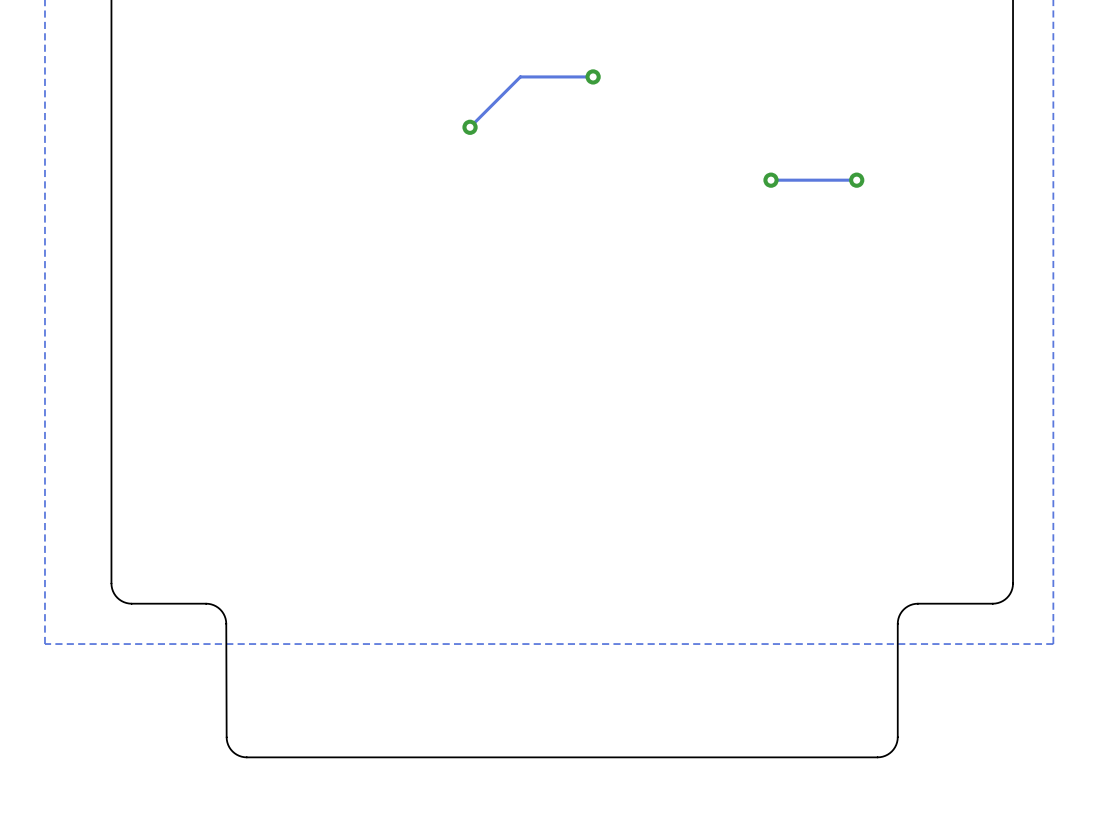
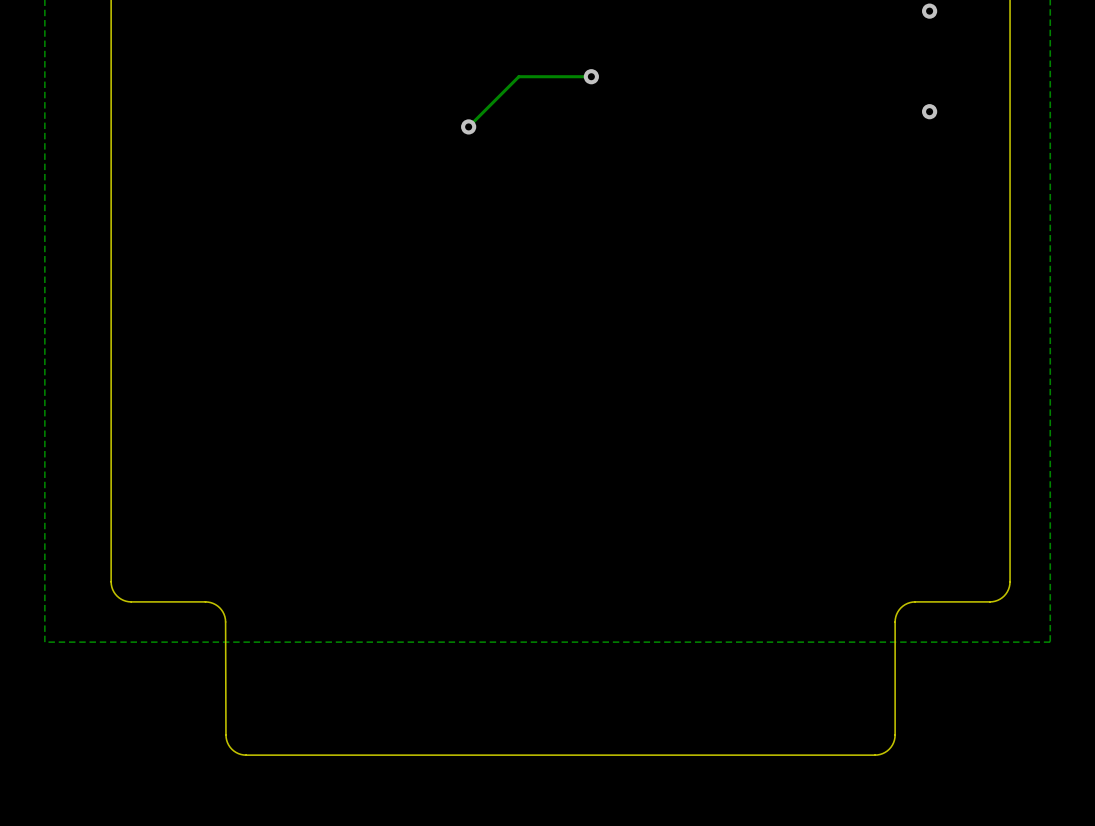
via: none -> (929, 11)
via: none -> (929, 111)
via: (771, 180) -> none
track: (856, 180) (771, 180) -> none
via: (856, 180) -> none

